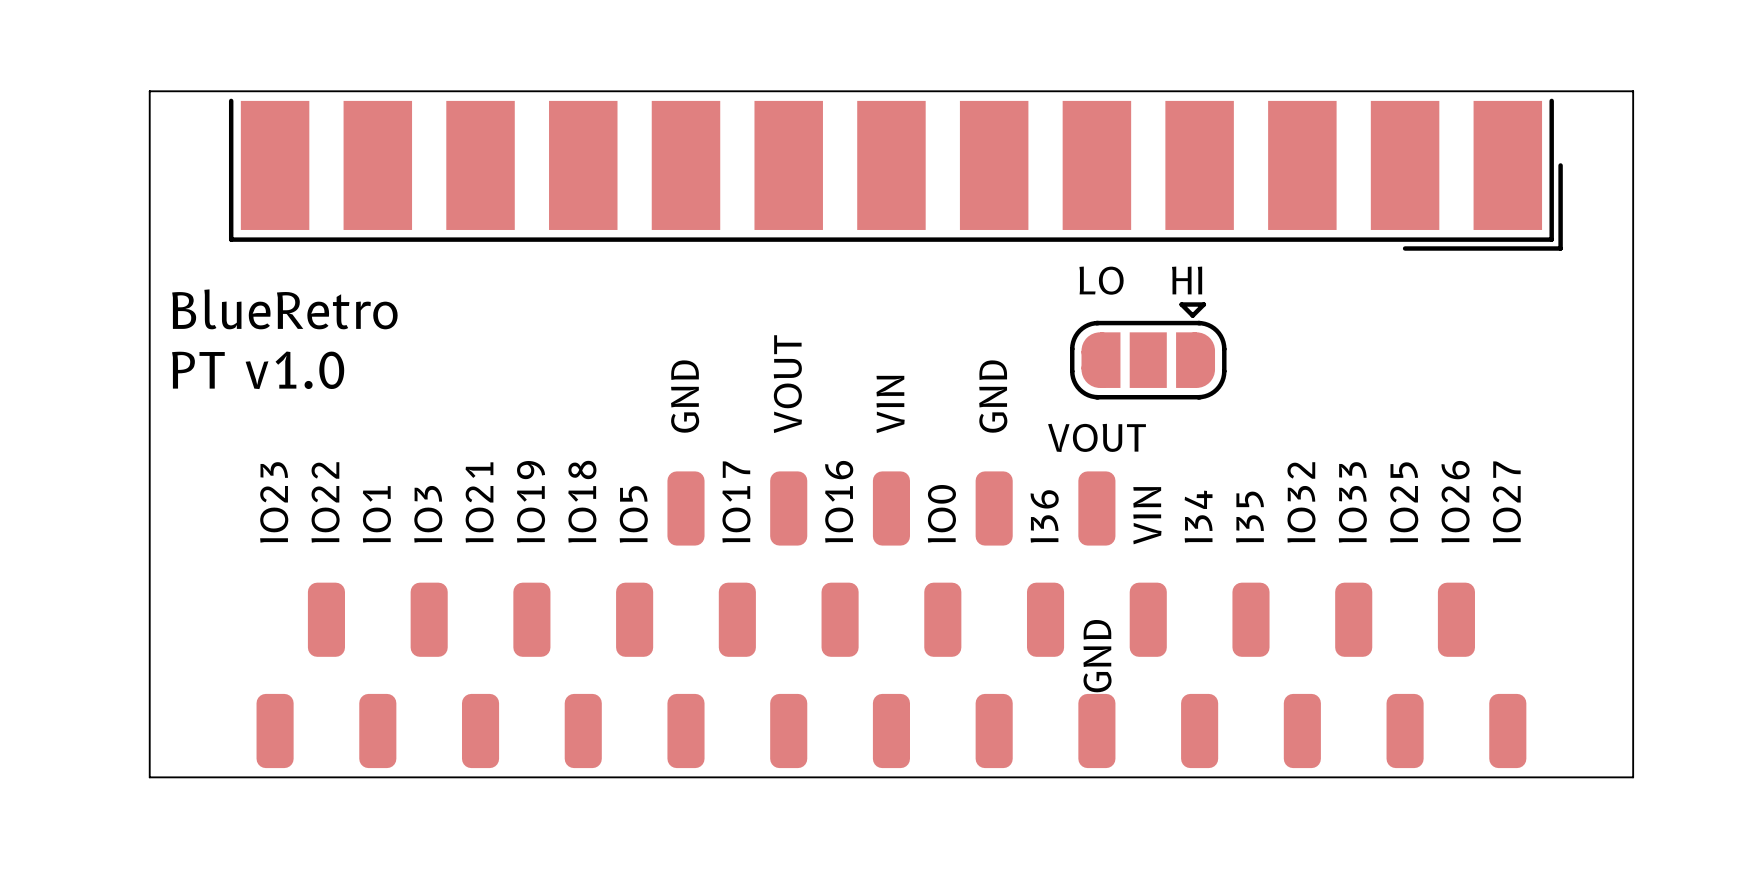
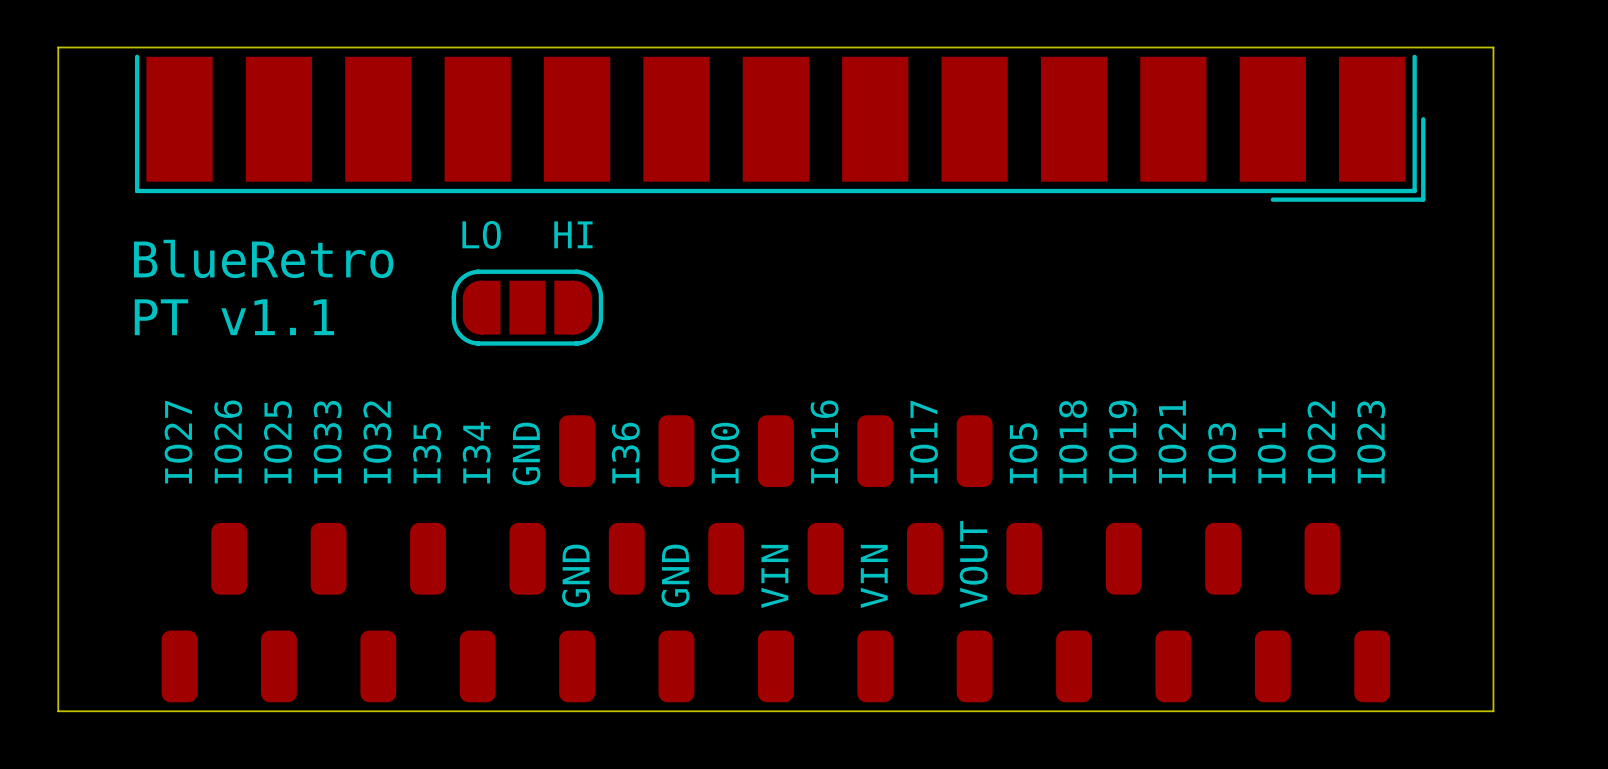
text position: LO (1101, 280) -> LO (481, 234)
text position: HI (1187, 280) -> HI (573, 234)
text position: BlueRetro (284, 309) -> BlueRetro (263, 258)
part: (1148, 350) -> none
part: none -> (527, 307)
text: PT v1.0 (258, 370) -> PT v1.1 (234, 317)
text: VOUT (787, 384) -> none
text: GND (685, 396) -> none
text: GND (993, 396) -> none
text: VIN (890, 404) -> none
text: VOUT (1096, 437) -> none
text: IO19 (531, 501) -> I35 (427, 453)
text: IO18 (582, 501) -> I34 (476, 452)
text: IO16 (839, 501) -> IO0 (725, 453)
text: IO26 (1455, 501) -> IO22 (1321, 442)
text: IO23 (274, 502) -> IO27 (178, 442)
text: IO22 (325, 502) -> IO26 (228, 441)
text: IO21 (479, 502) -> IO32 (377, 442)
text: IO17 (736, 502) -> I36 (625, 453)
text: IO32 (1301, 502) -> IO21 (1172, 442)
text: IO33 (1352, 502) -> IO3 (1222, 453)
text: IO25 (1404, 502) -> IO1 (1271, 453)
text: IO27 (1506, 502) -> IO23 (1371, 442)
text: IO0 (941, 513) -> IO16 (824, 441)
text: IO1 (376, 514) -> IO25 (277, 442)
text: IO3 (428, 514) -> IO33 (327, 442)
text: IO5 (633, 514) -> GND (526, 453)
text: VIN (1147, 515) -> IO5 (1023, 453)
text: I36 (1044, 516) -> IO17 (923, 442)
text: I34 (1198, 516) -> IO18 (1073, 441)
text: I35 (1249, 517) -> IO19 (1122, 442)
text: none -> GND (576, 575)
text: none -> GND (675, 575)
text: none -> VIN (774, 576)
text: none -> VIN (874, 576)
text: GND (1097, 656) -> VOUT (973, 564)

